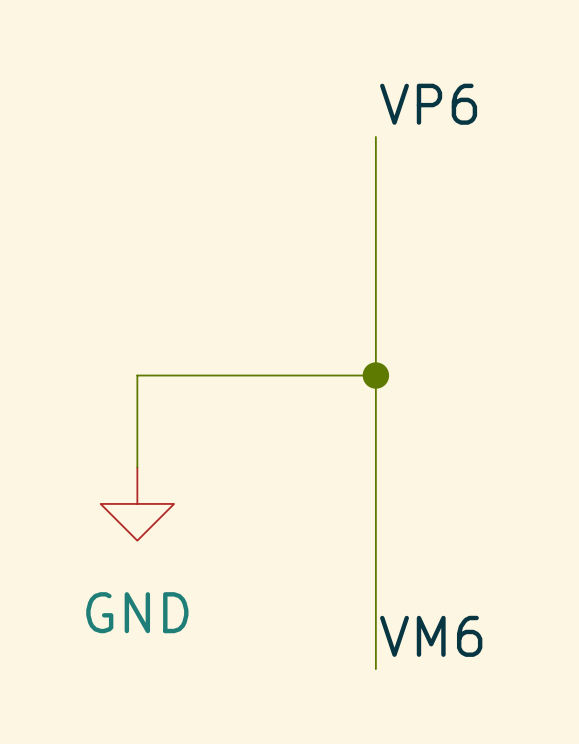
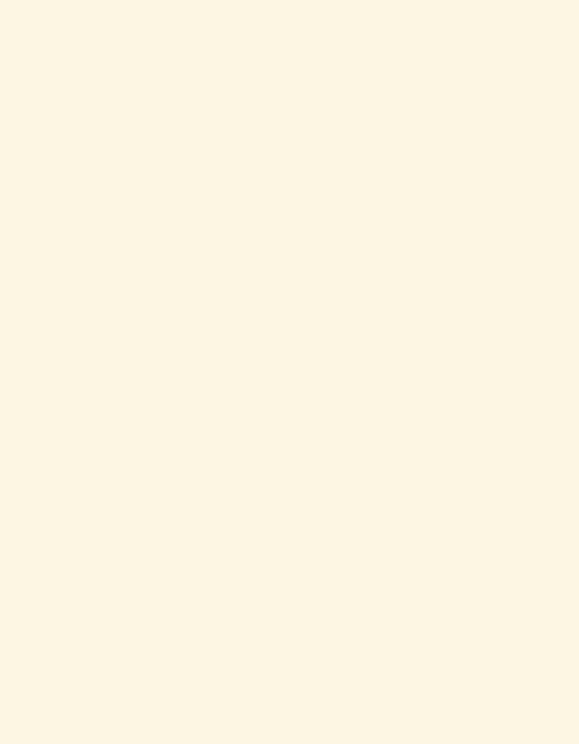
label: VP6 (428, 104) -> none
wire: (375, 136) (375, 669) -> none
wire: (375, 375) (137, 375) (137, 467) -> none
junction: (375, 375) -> none
power symbol: GND (137, 503) -> none
label: VM6 (431, 636) -> none

